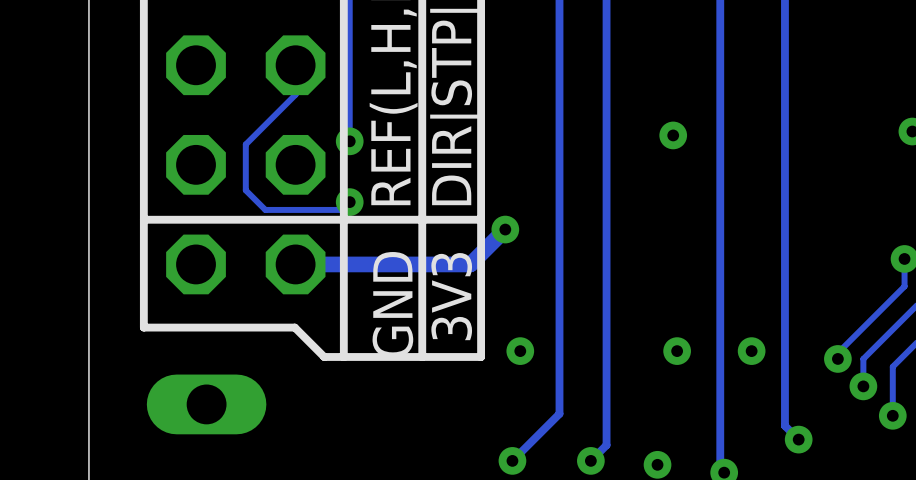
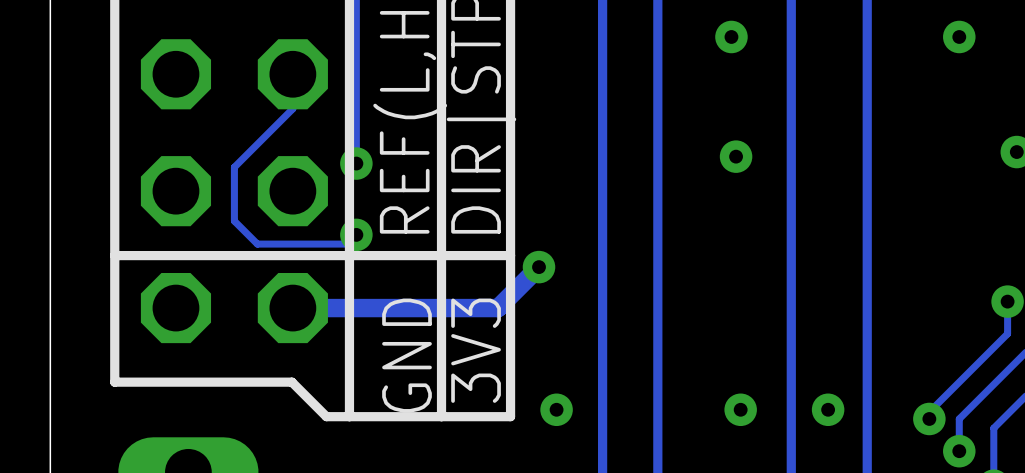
via: none -> (731, 36)
via: none -> (959, 36)

